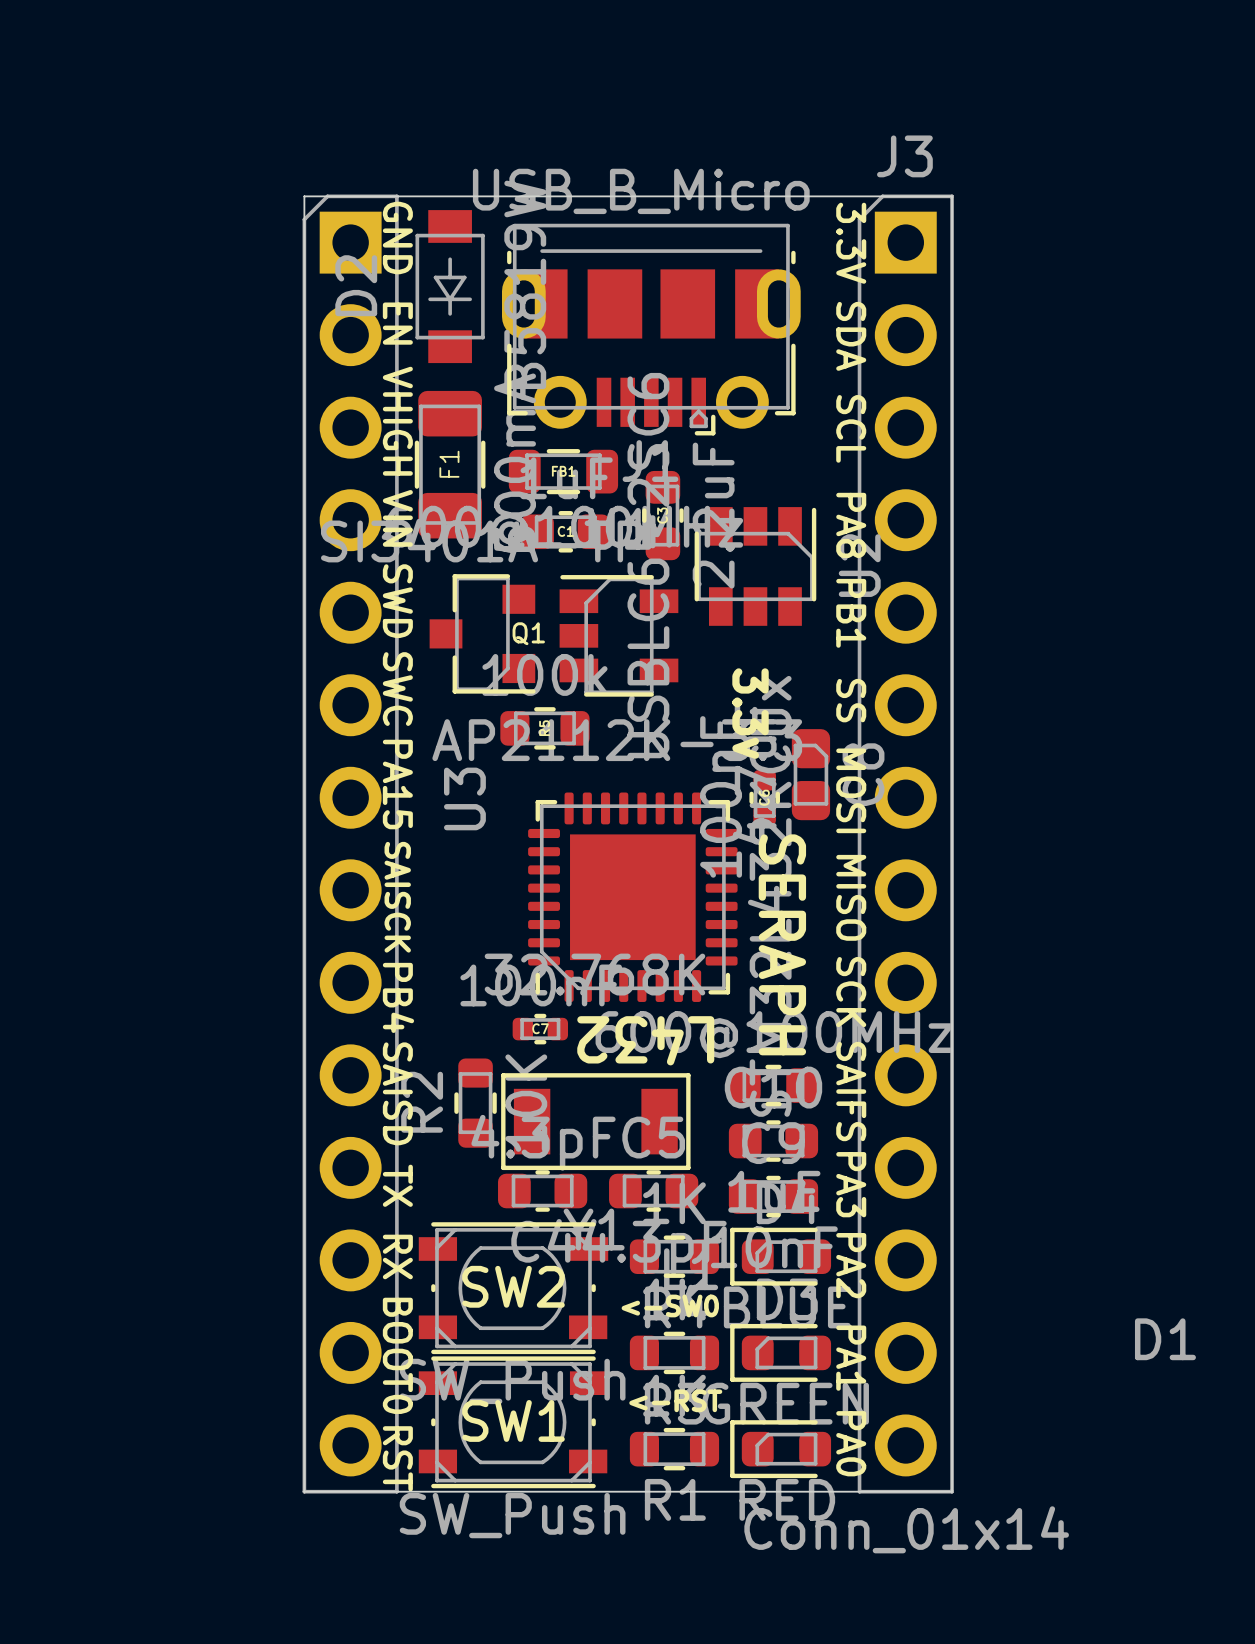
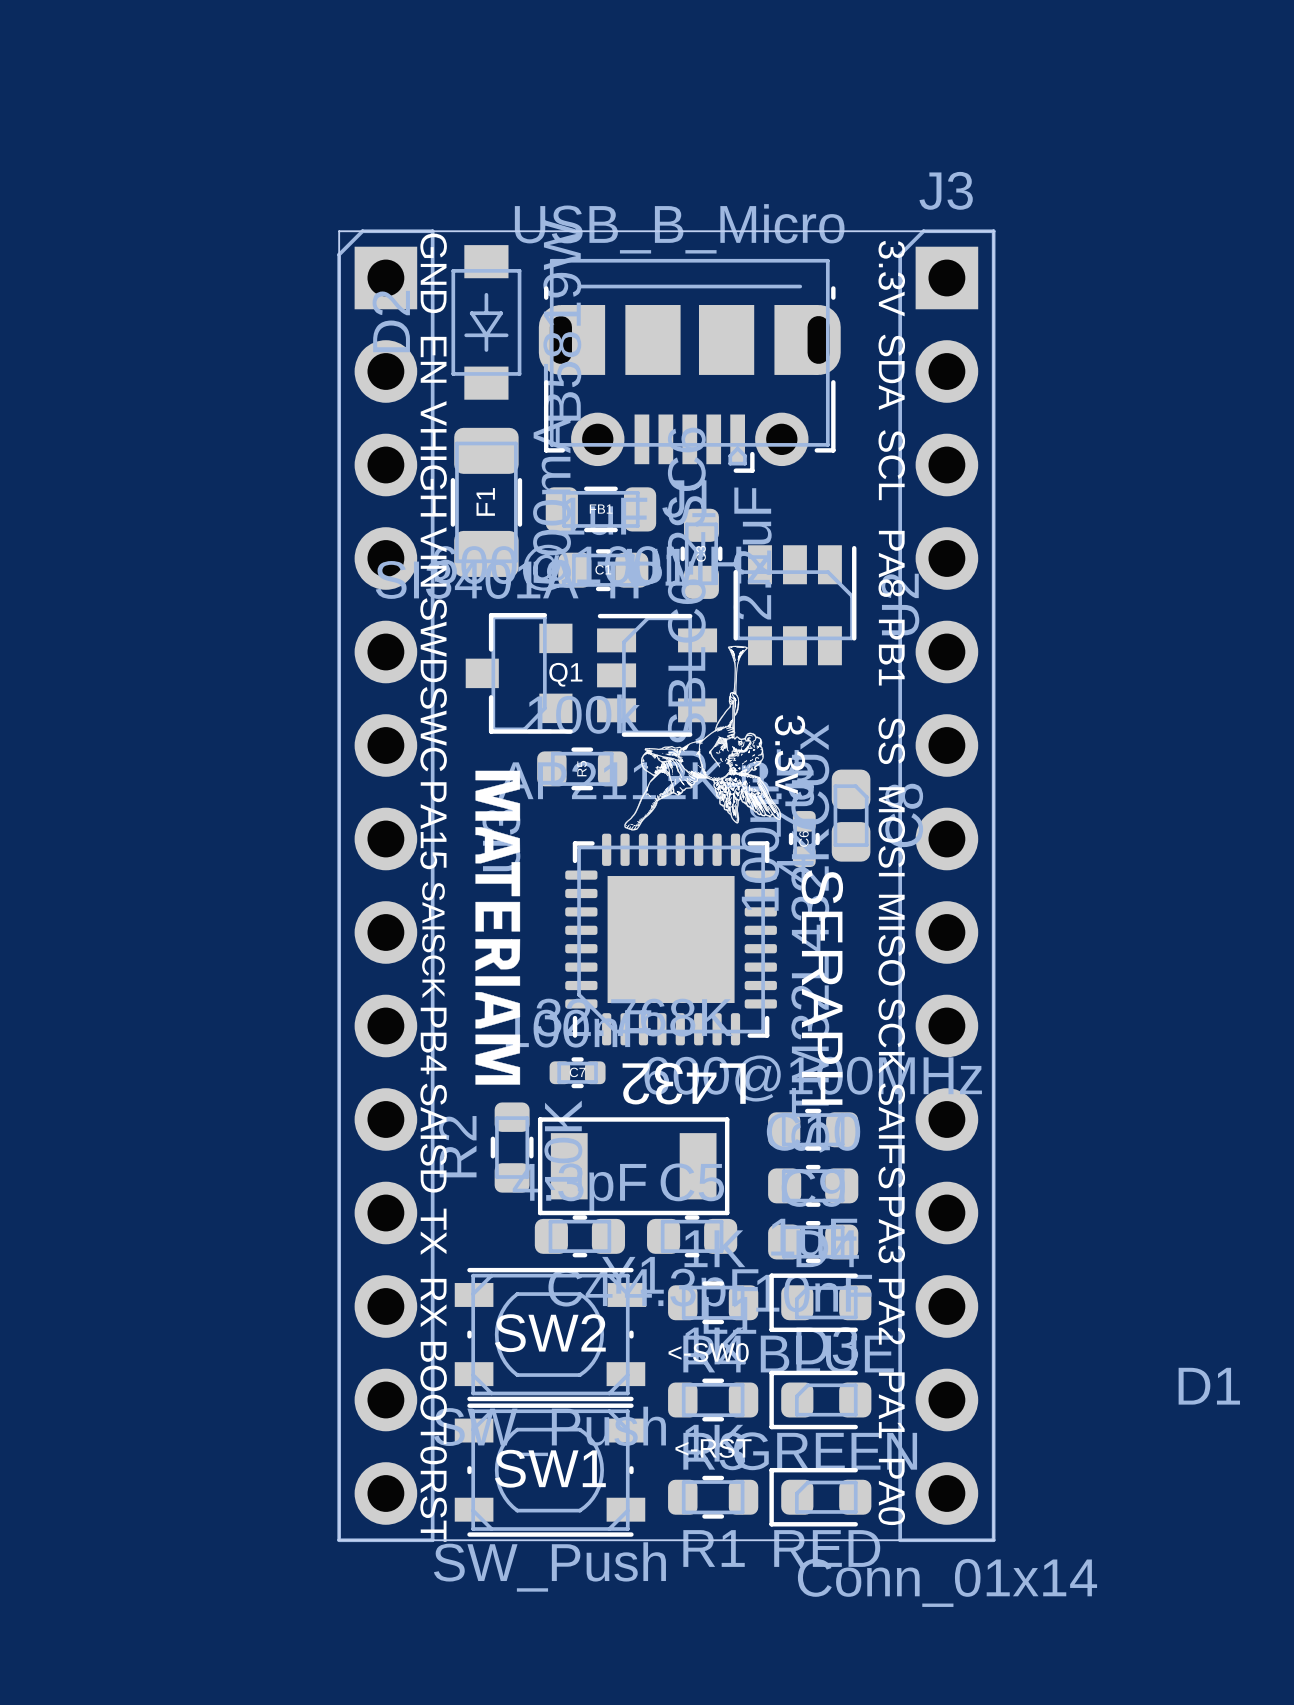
drawing: none -> [624, 645, 782, 831]
drawing: none -> [475, 770, 521, 1085]

